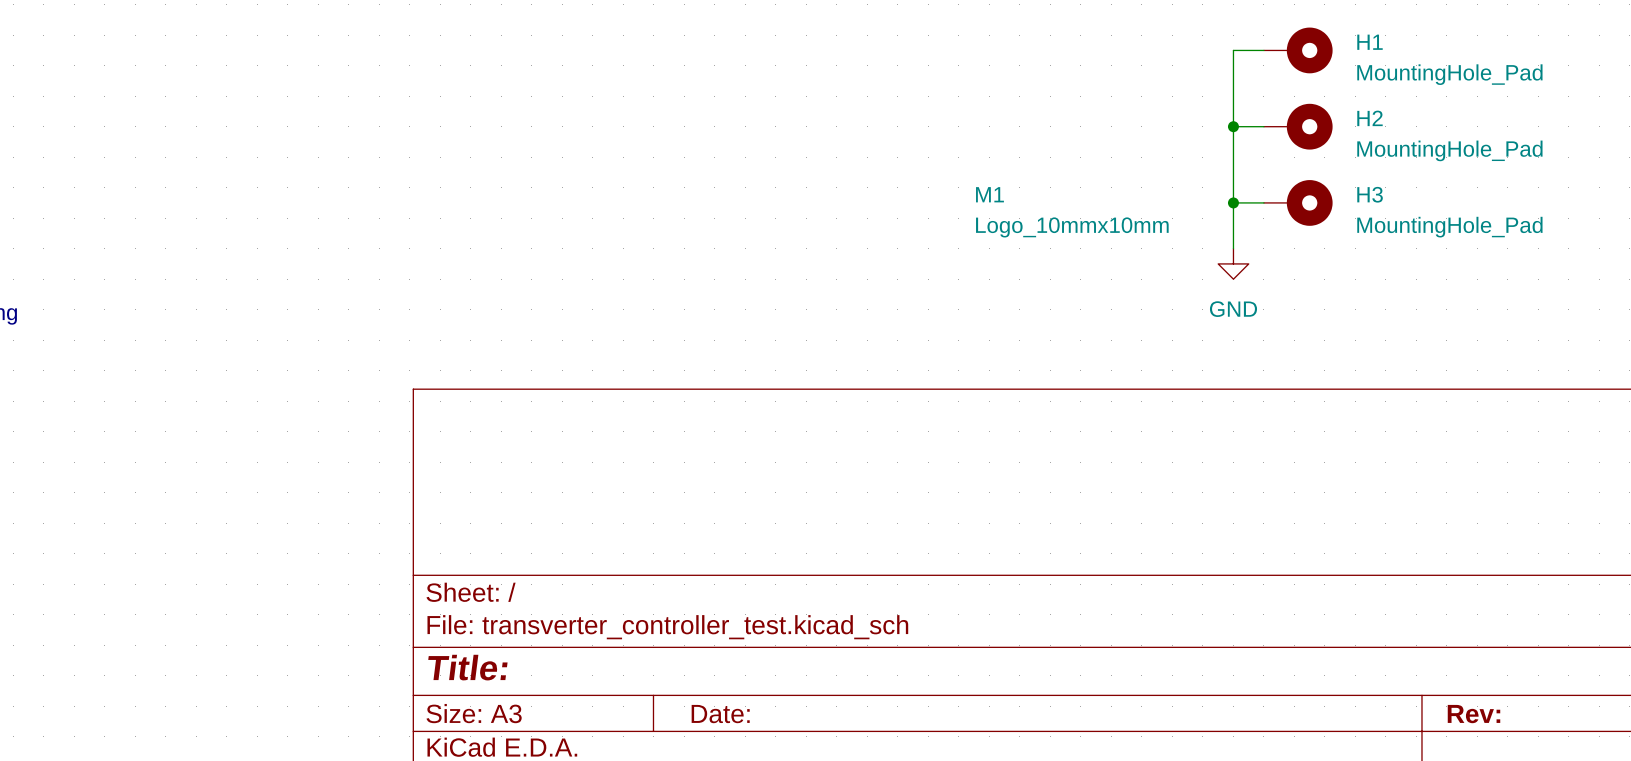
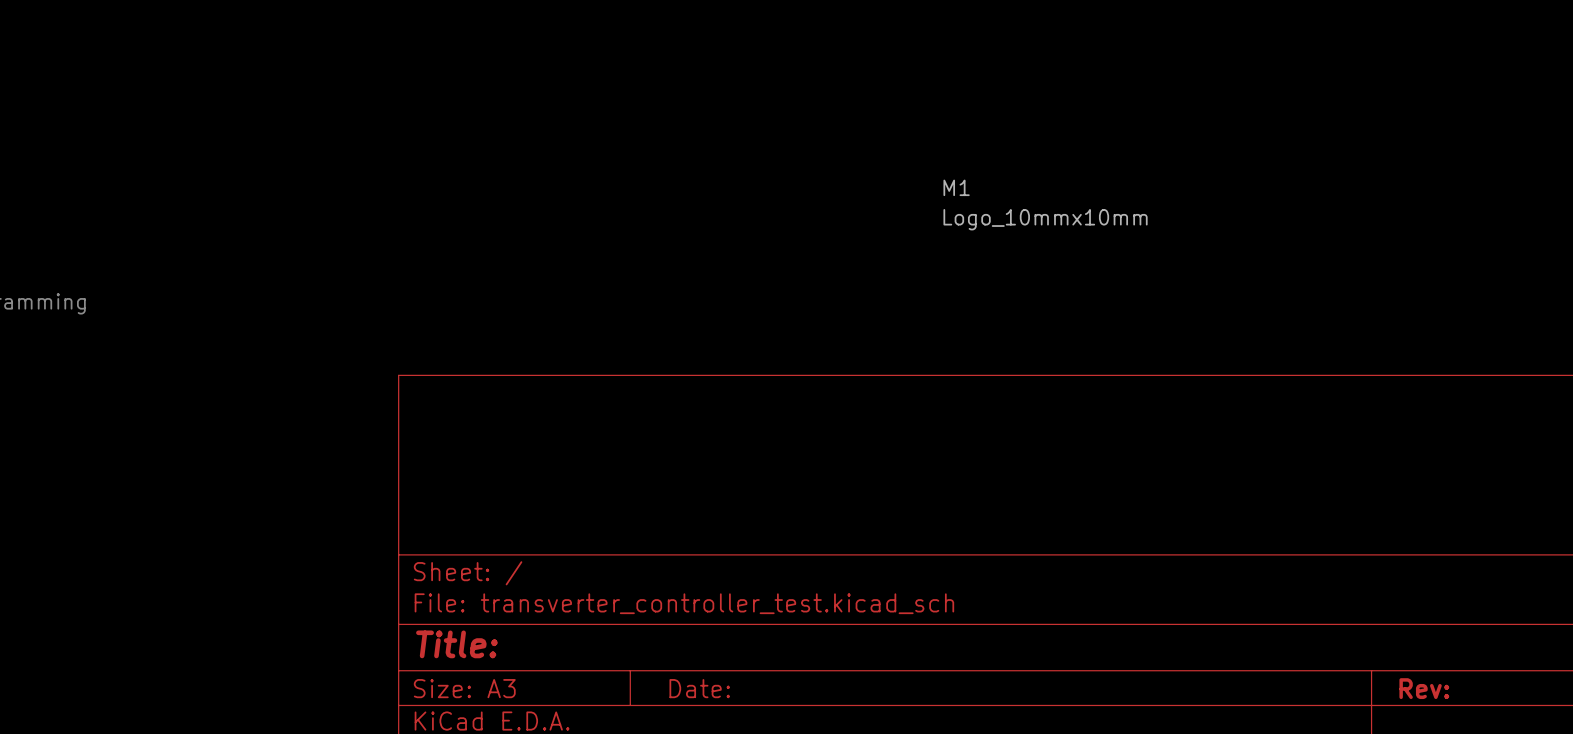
wire: (1263, 50) (1233, 50) (1233, 248) -> none
H1: MountingHole_Pad (1298, 50) -> none
wire: (1233, 126) (1263, 126) -> none
junction: (1233, 126) -> none
H2: MountingHole_Pad (1298, 126) -> none
wire: (1233, 202) (1263, 202) -> none
junction: (1233, 202) -> none
H3: MountingHole_Pad (1298, 202) -> none
power symbol: GND (1233, 263) -> none

